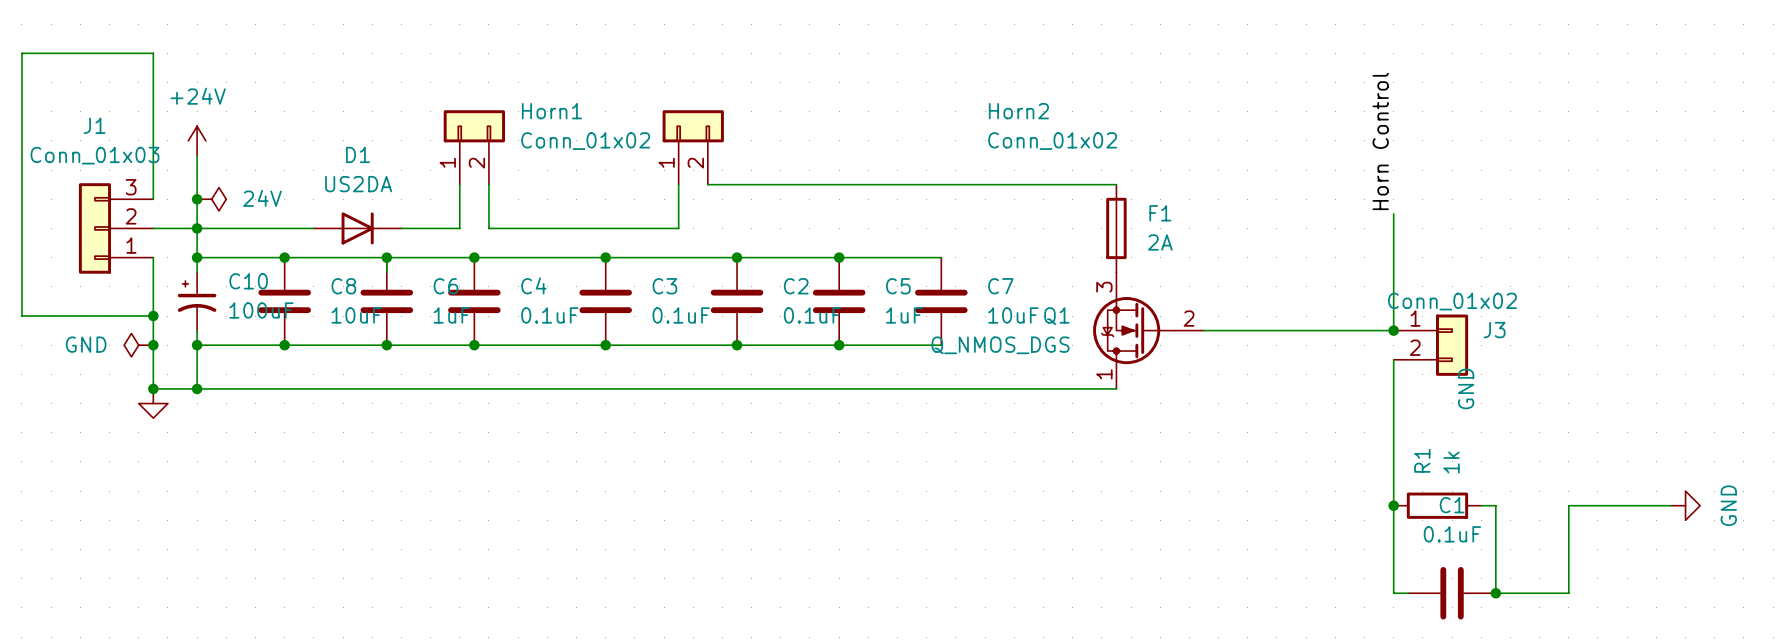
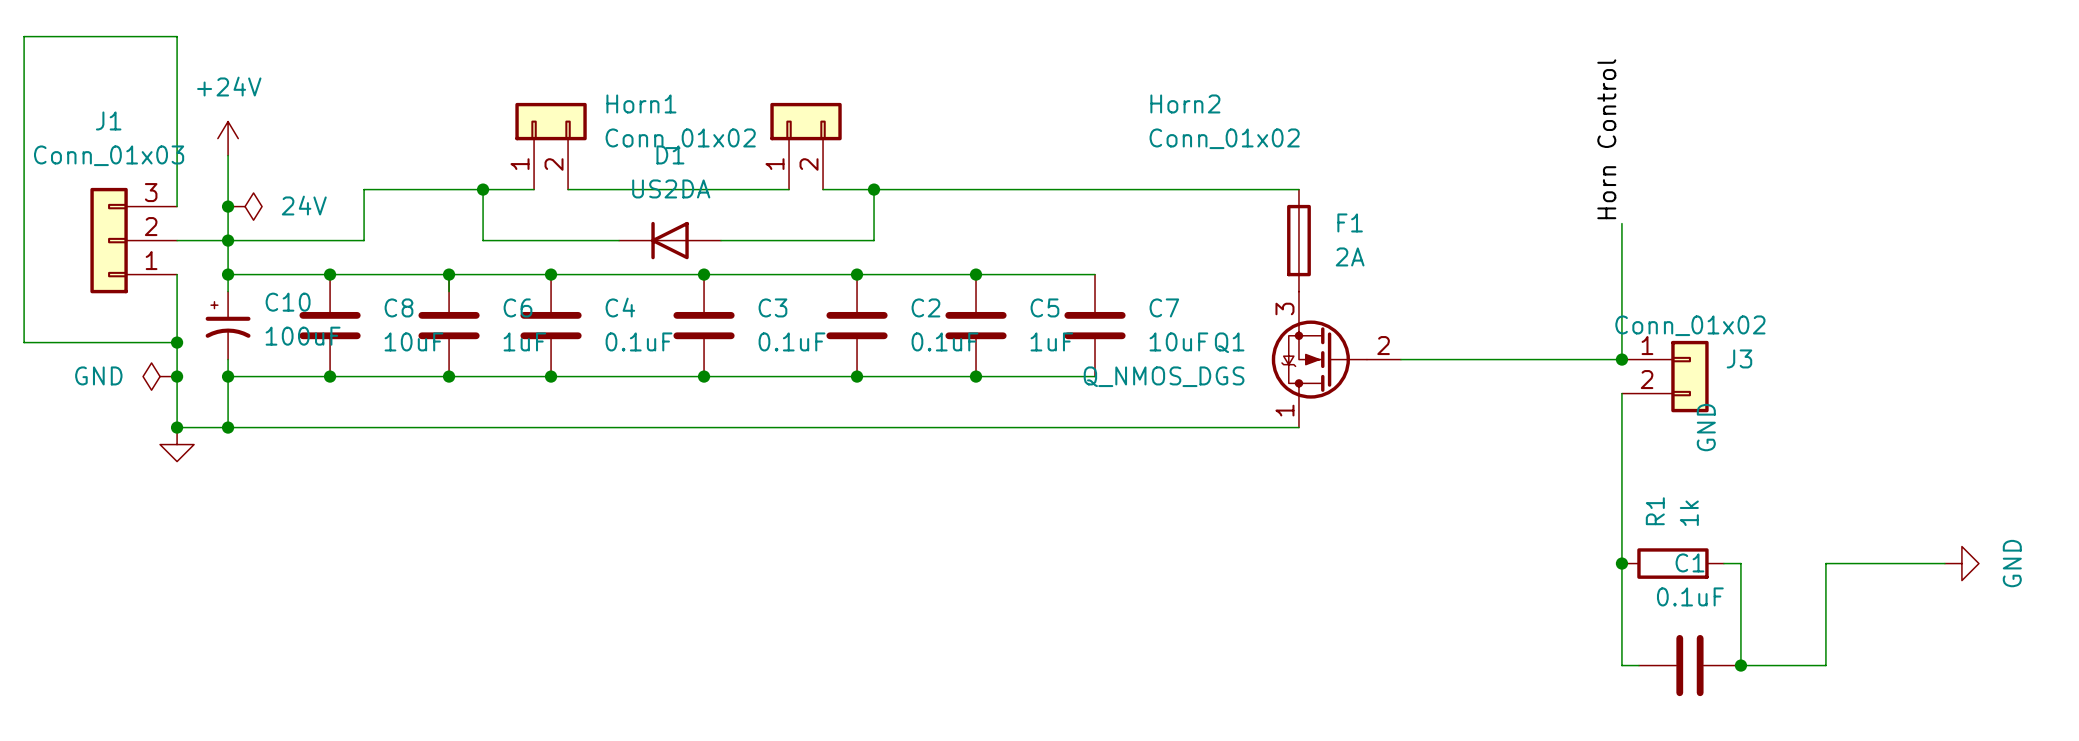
junction: none -> (483, 189)
wire: (459, 184) (459, 228) -> (568, 240) (534, 240)
wire: none -> (534, 189) (364, 189) (364, 240)
wire: (488, 184) (488, 228) -> (568, 189) (789, 189)
wire: (678, 184) (678, 228) -> (874, 189) (874, 240) (789, 240)
junction: none -> (874, 189)
D1 rotation: 0° (357, 228) -> 180° (670, 240)
D1 position: (357, 228) -> (670, 240)
wire: (401, 228) (415, 228) -> (483, 189) (483, 240)

